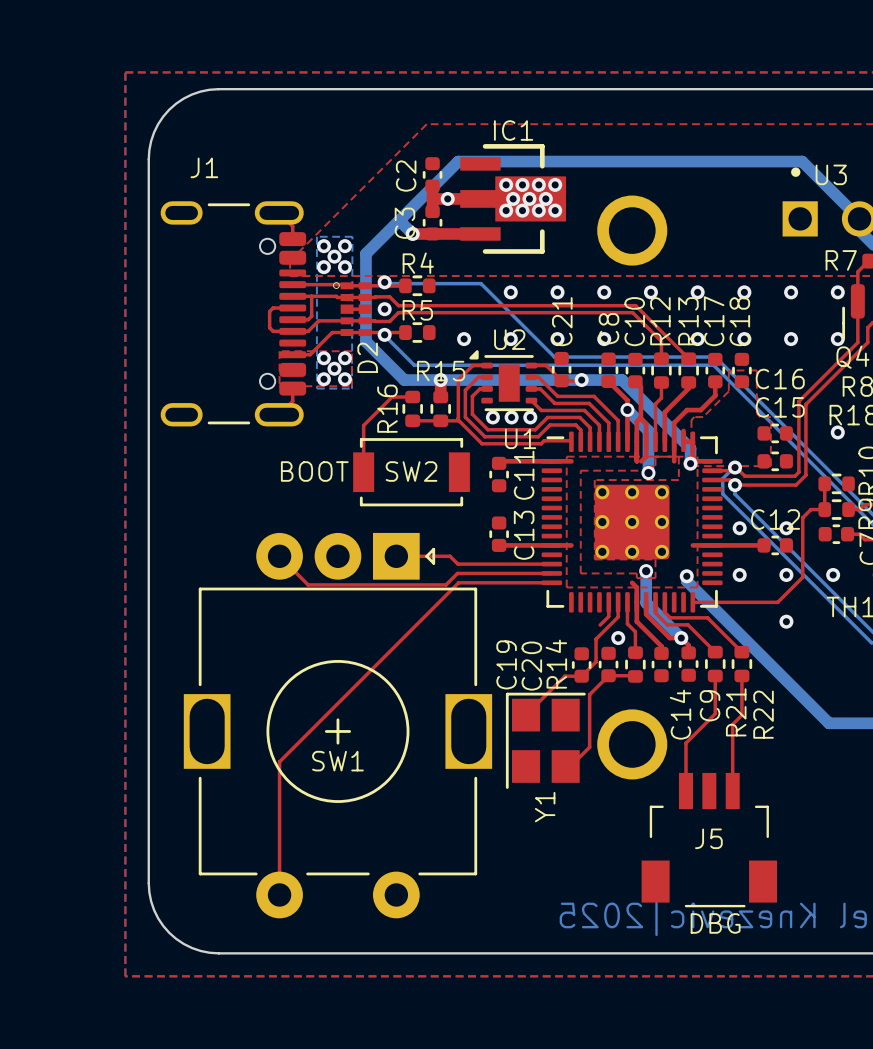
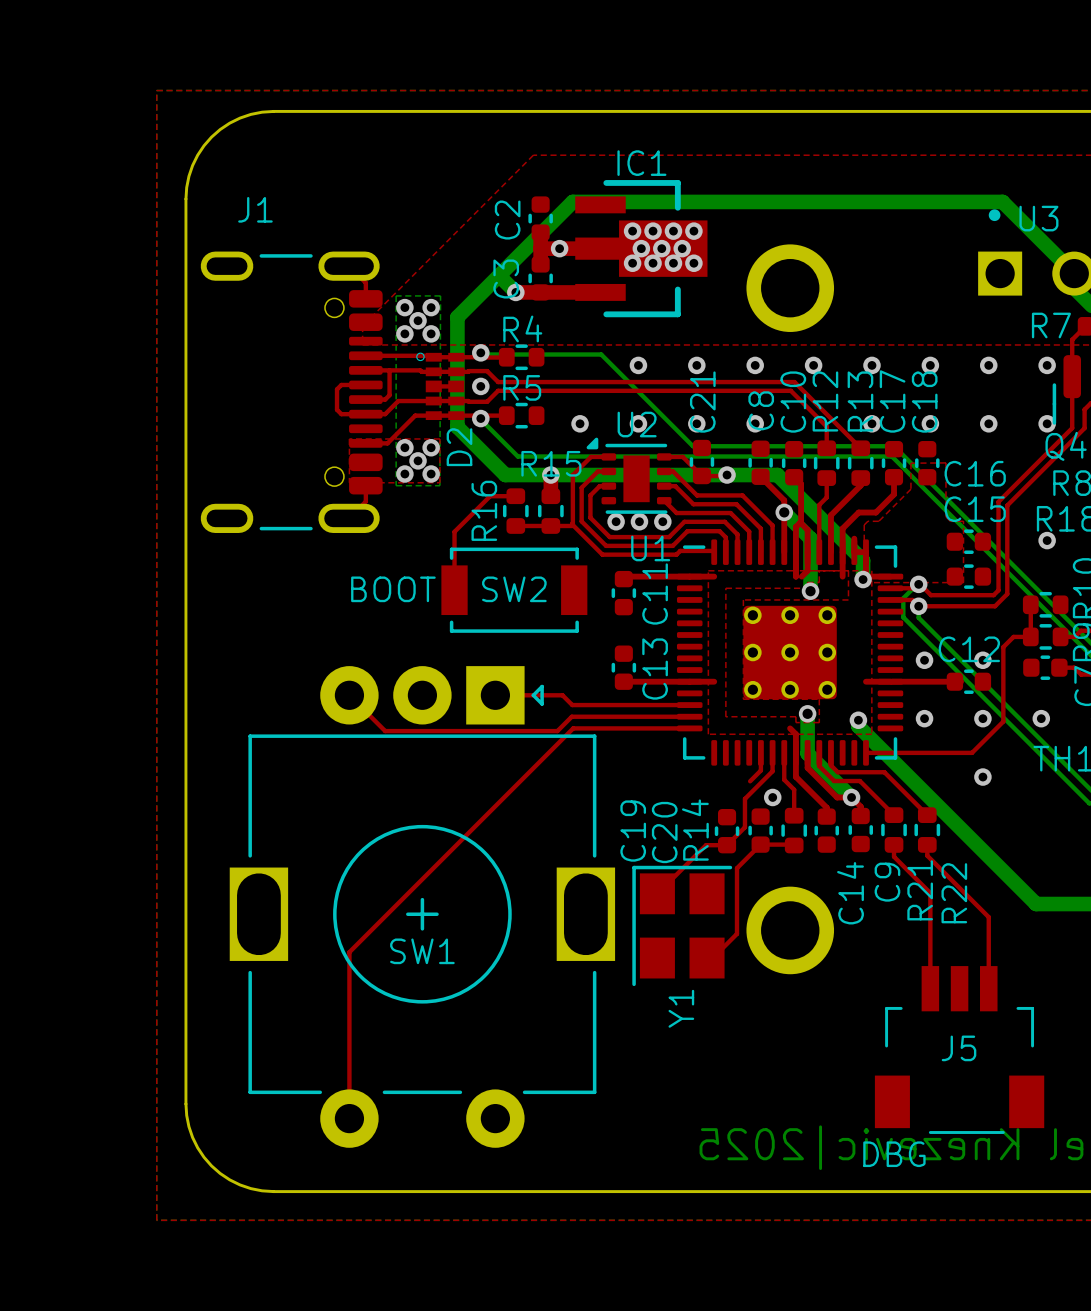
top track: (741, 684) (741, 715) (732, 724) (732, 801) -> (927, 855) (988, 917) (988, 988)
top track: (715, 685) (715, 713) (685, 743) (685, 801) -> (894, 856) (930, 893) (930, 988)
J5 position: (709, 840) -> (959, 1050)

